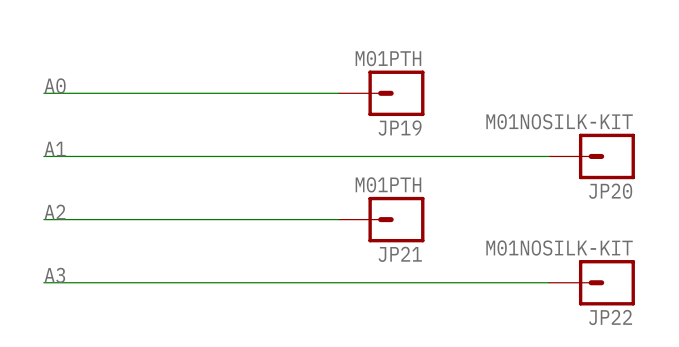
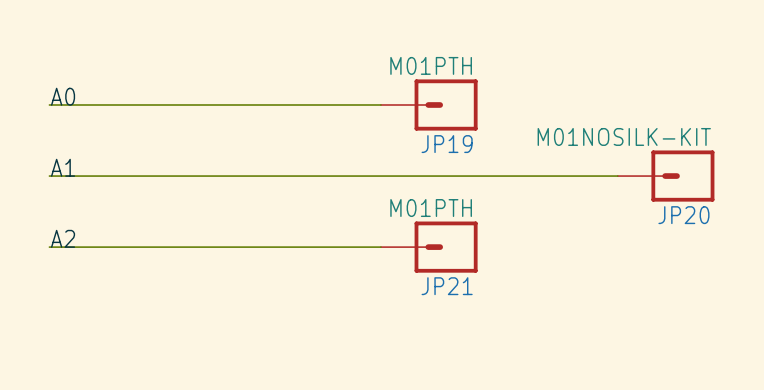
label: A3 (54, 275) -> none
wire: (43, 282) (549, 282) -> none
JP22: M01NOSILK-KIT (591, 282) -> none

